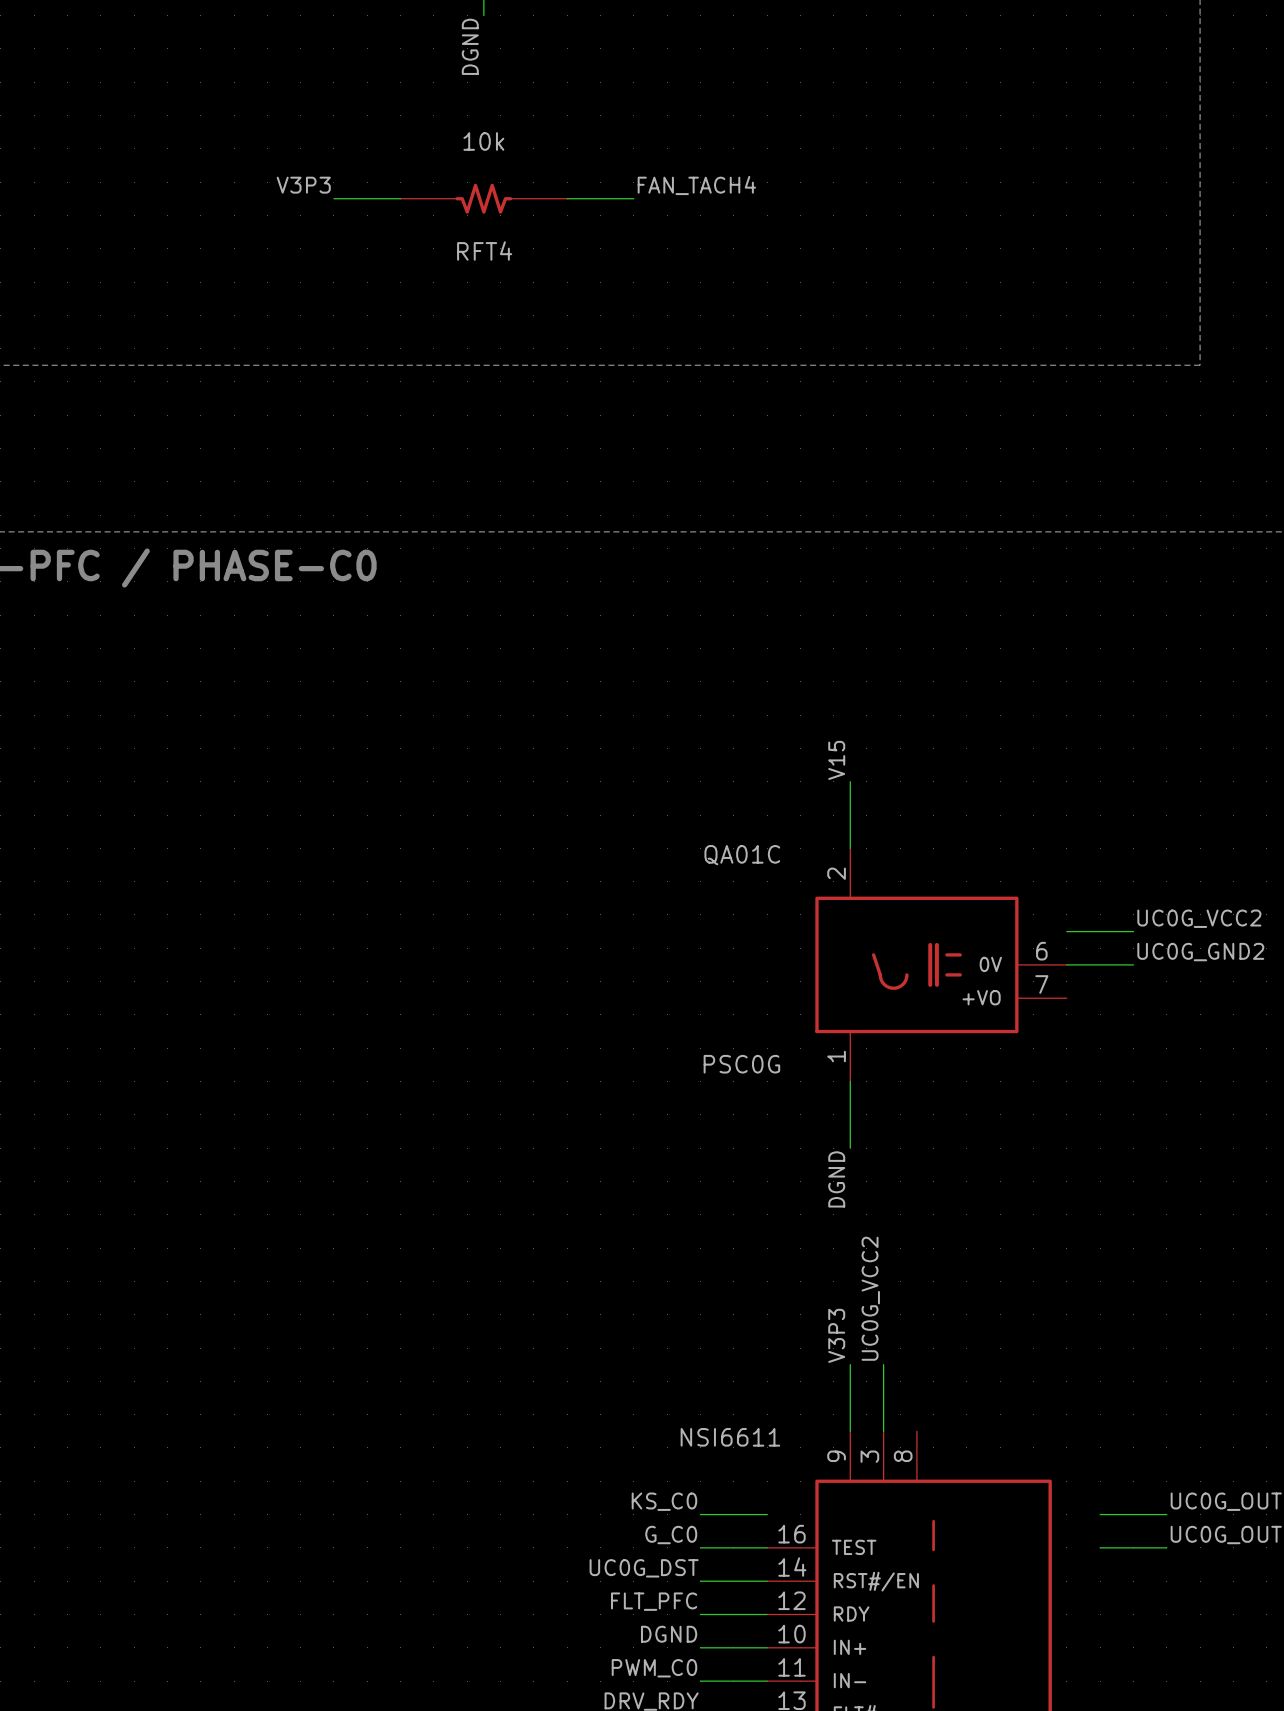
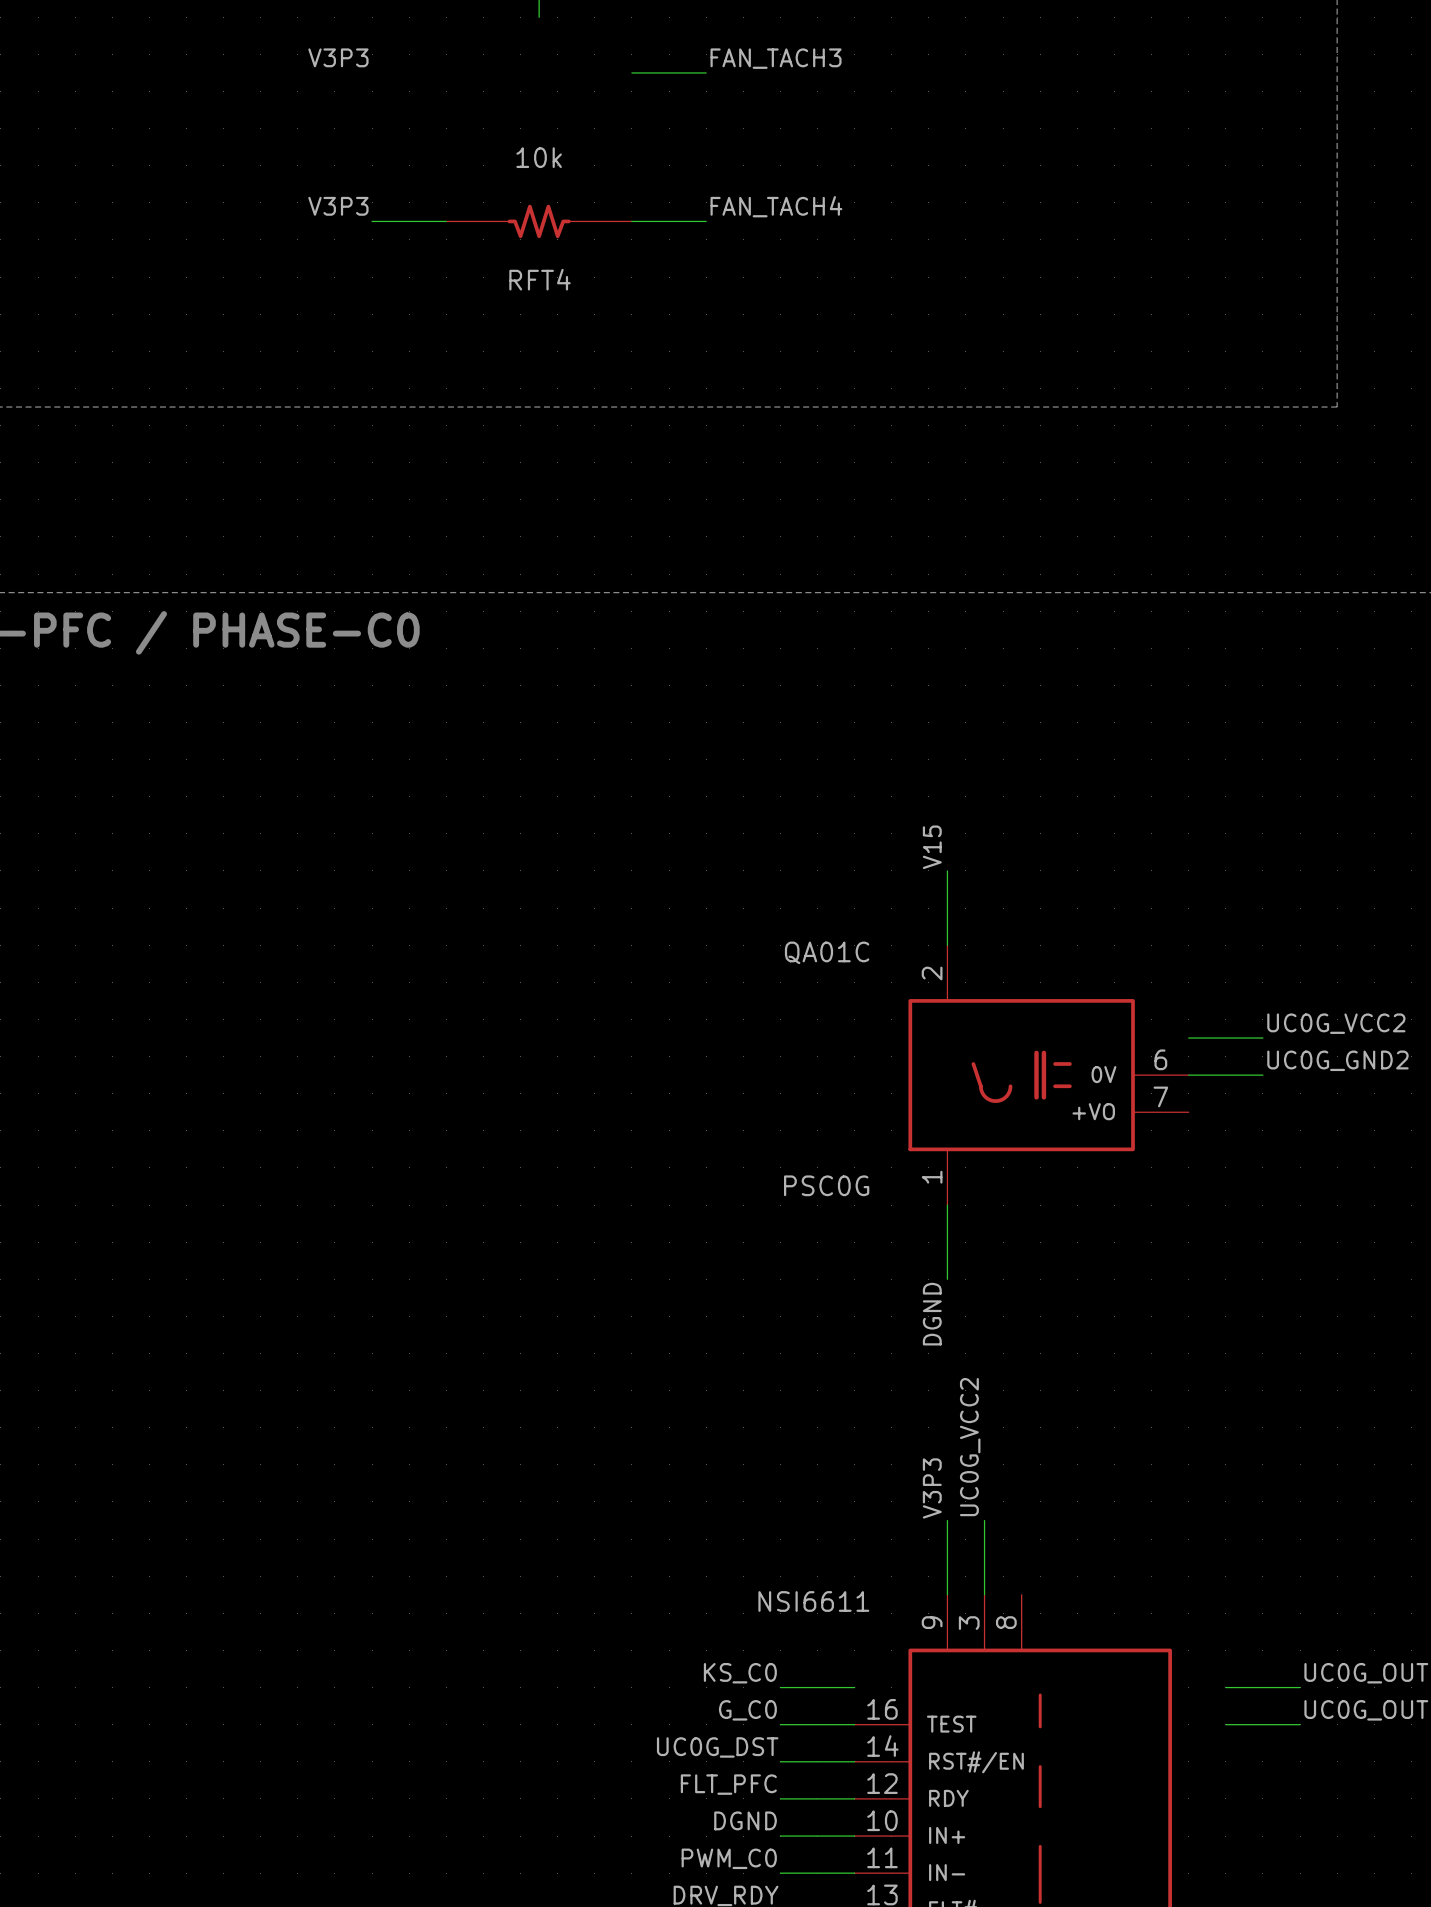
label: DGND (470, 46) -> none
label: none -> V3P3 (338, 57)
label: none -> FAN_TACH3 (776, 58)
wire: none -> (631, 72) (706, 72)

